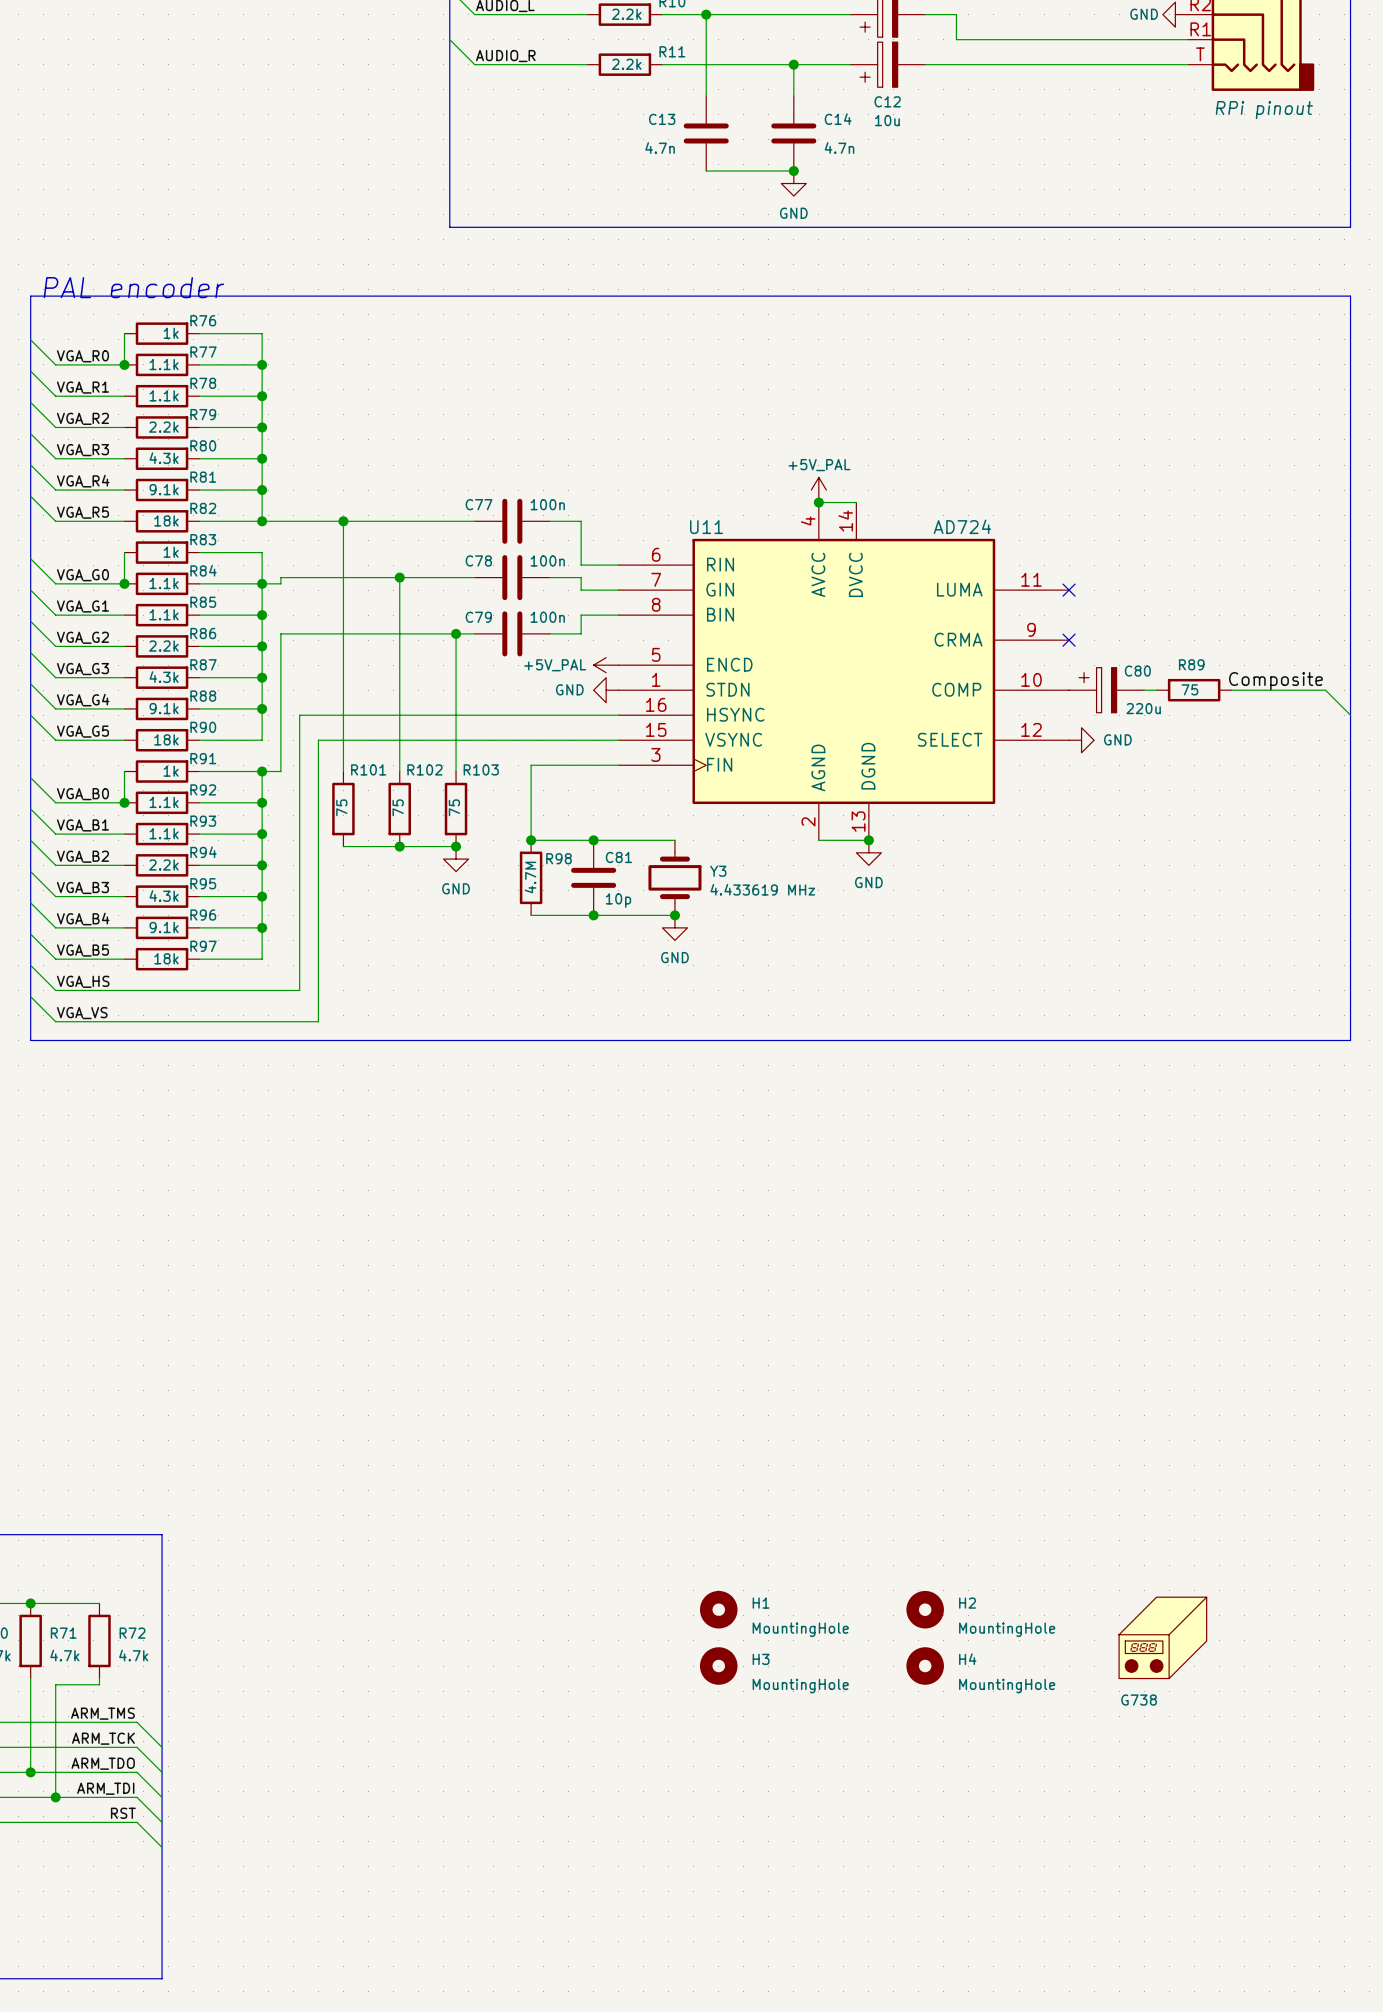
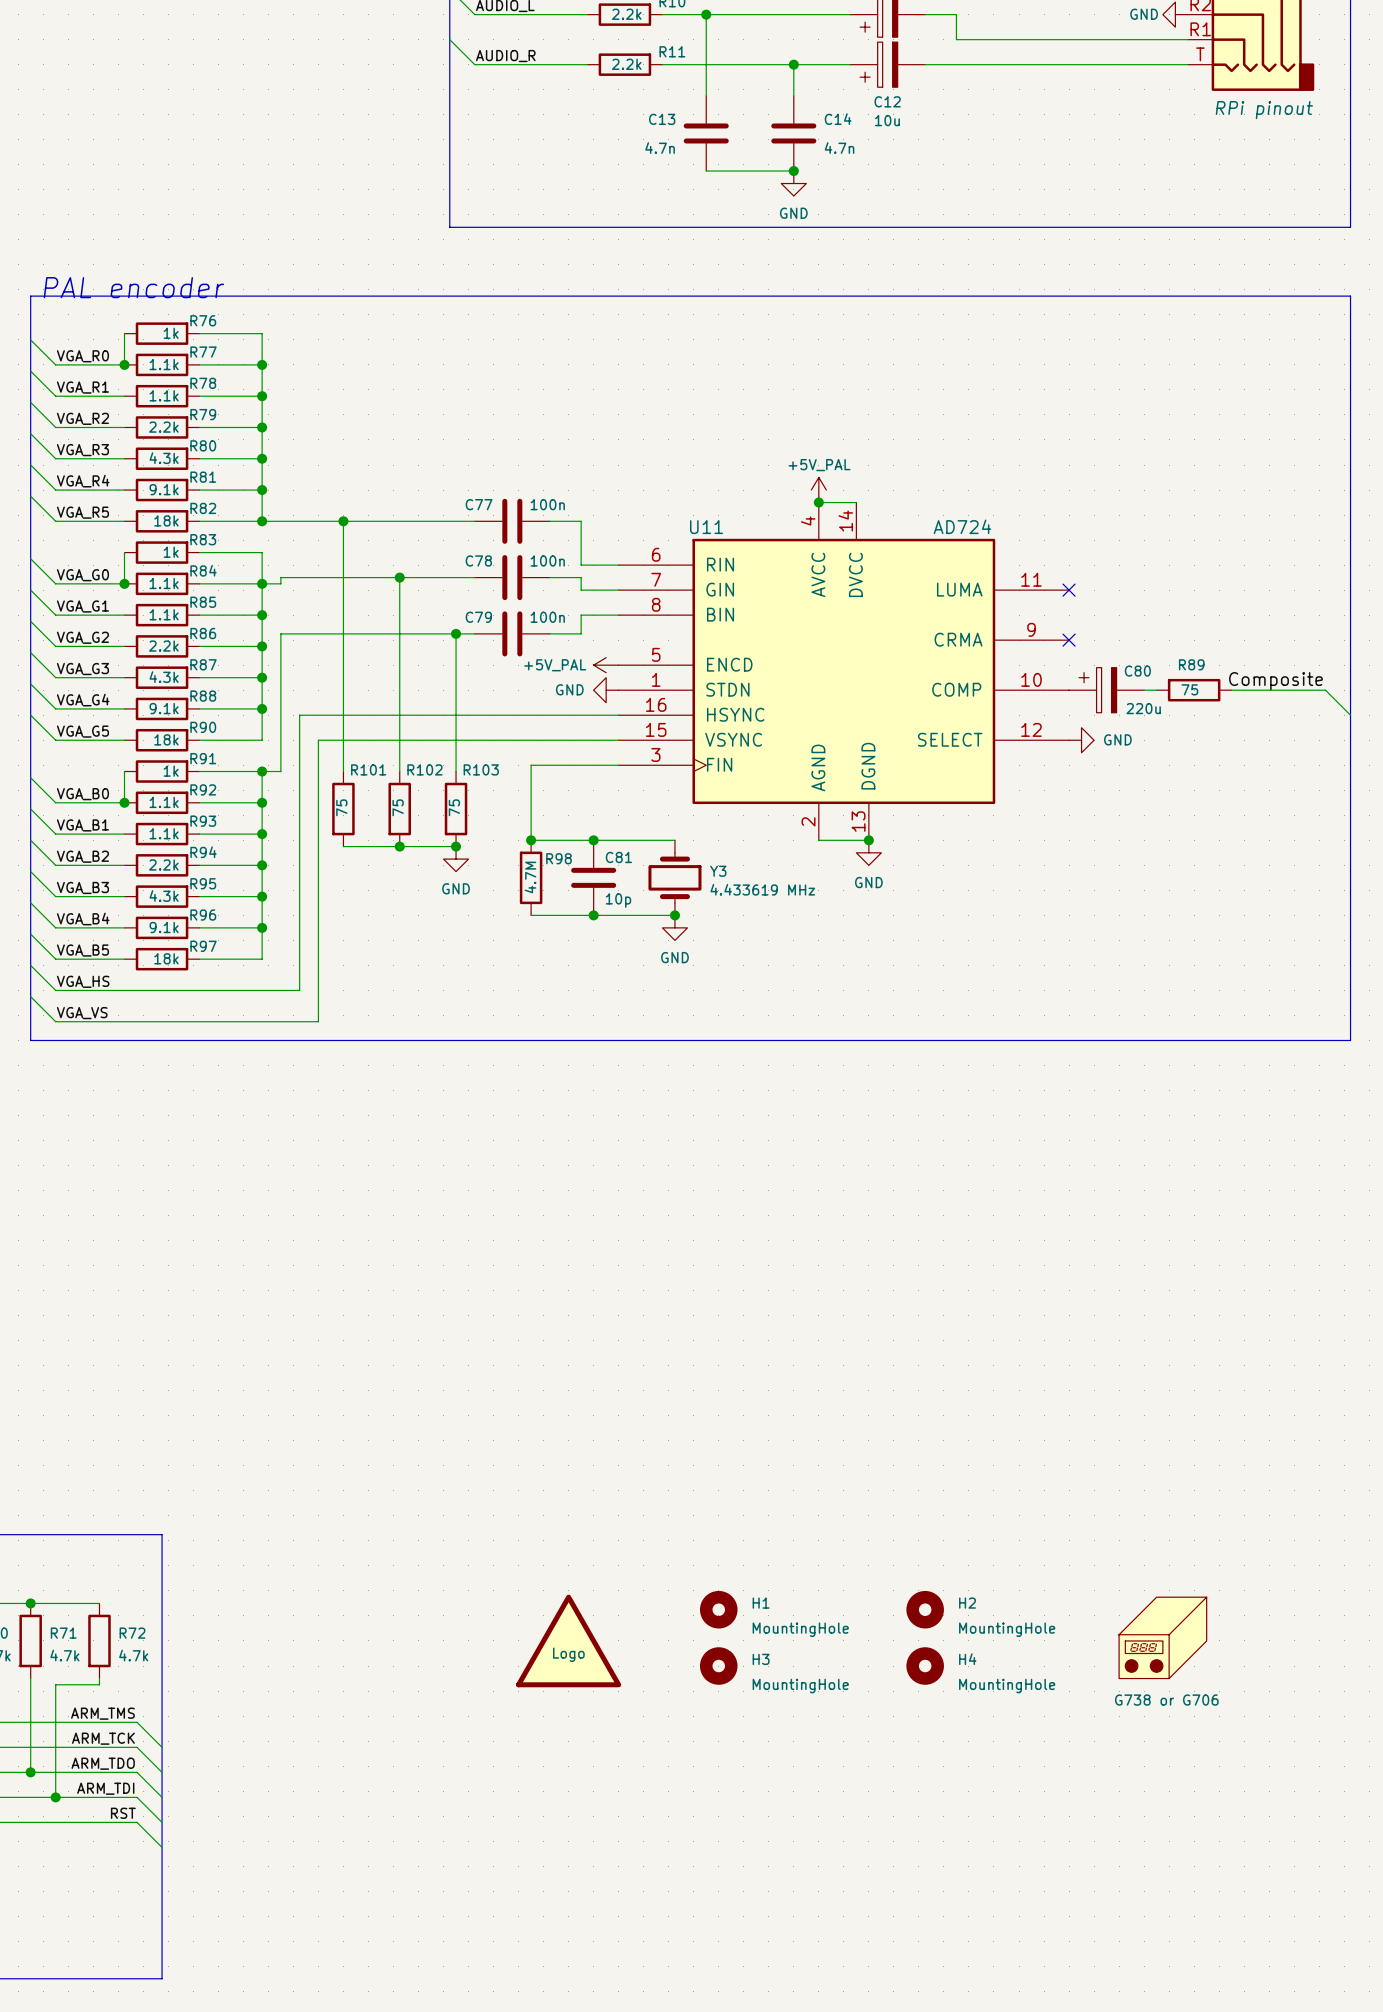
part: none -> (568, 1640)
part value: G738 (1139, 1700) -> G738 or G706 (1166, 1700)

